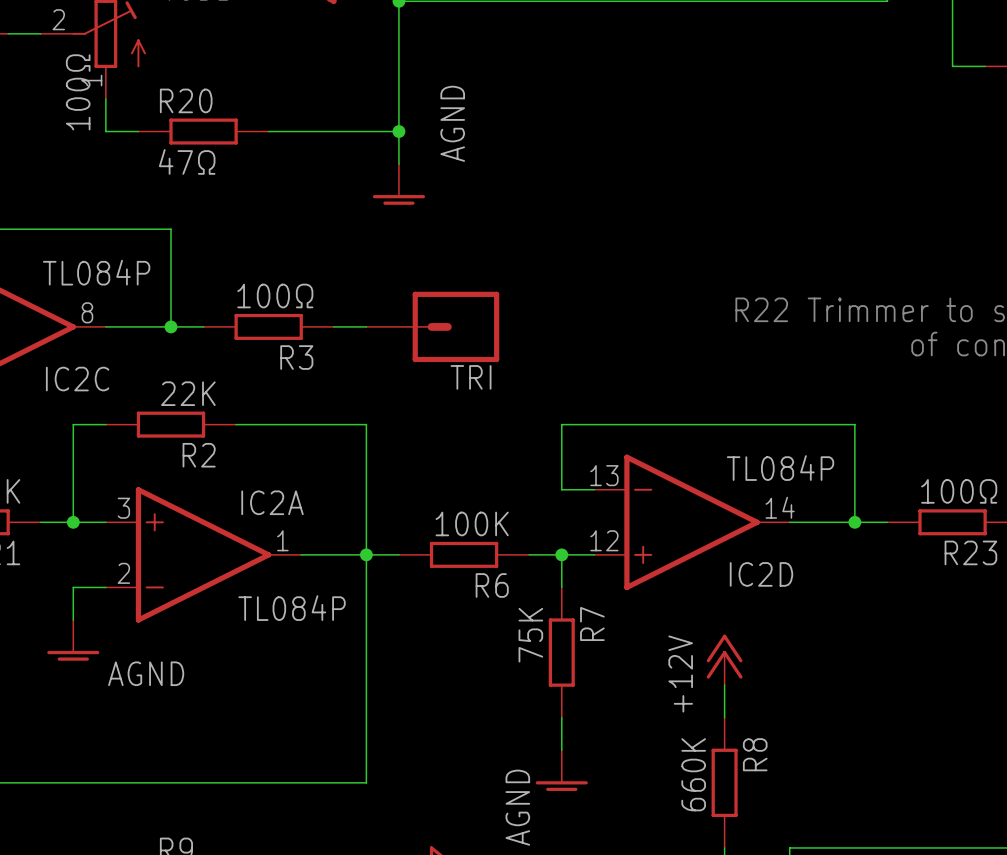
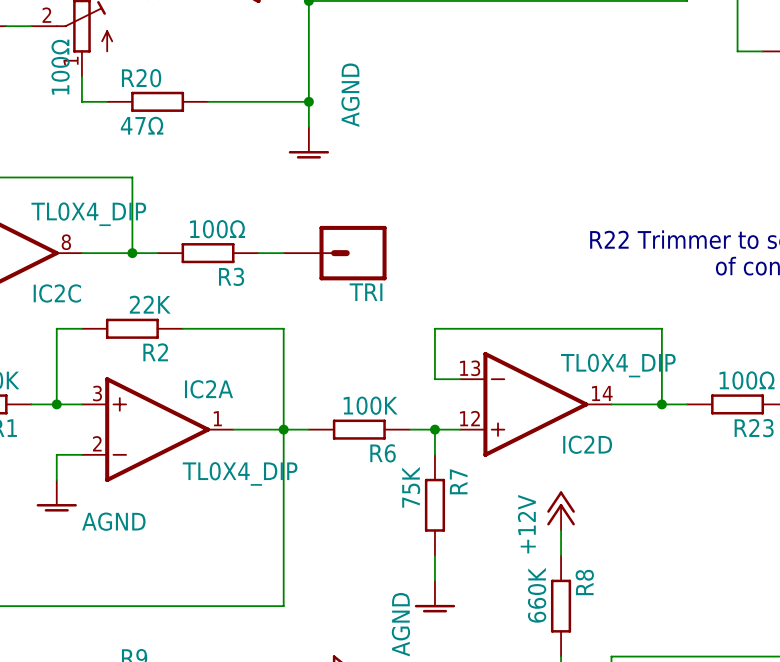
IC2C value: TL084P (96, 272) -> TL0X4_DIP (88, 214)
IC2D value: TL084P (780, 468) -> TL0X4_DIP (618, 365)
IC2A value: TL084P (292, 608) -> TL0X4_DIP (240, 473)

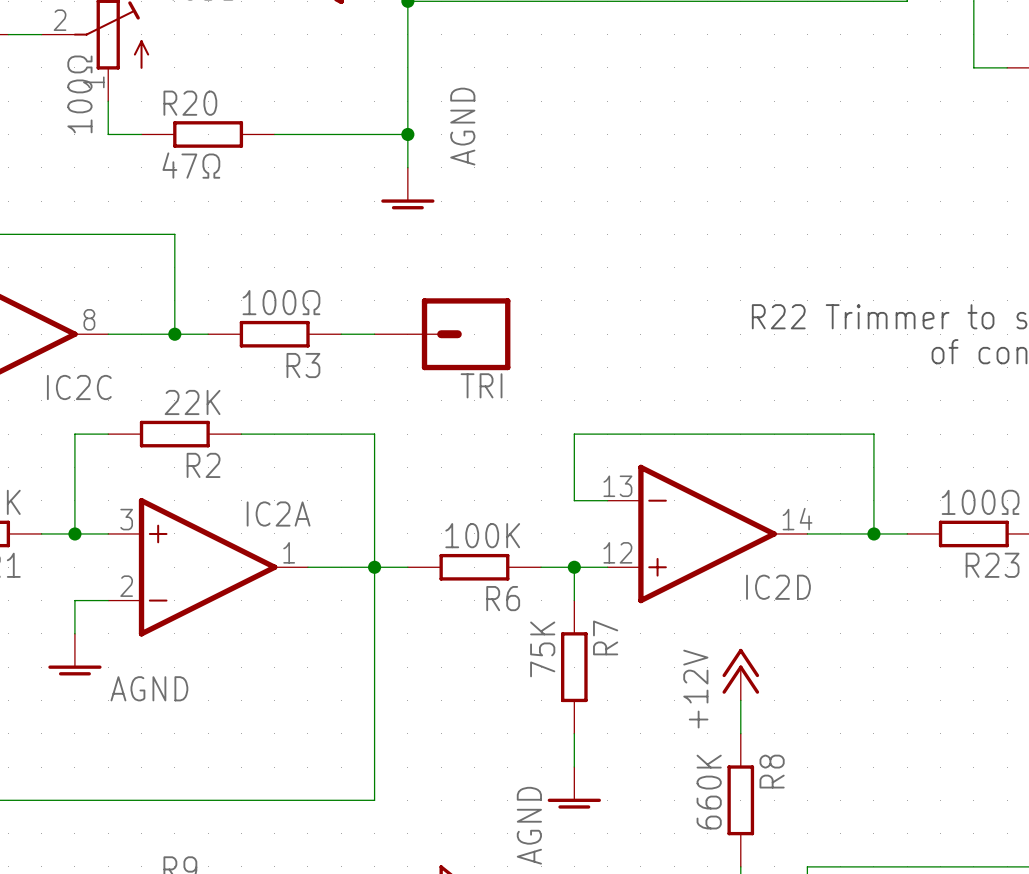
IC2C value: TL0X4_DIP (88, 214) -> none
IC2D value: TL0X4_DIP (618, 365) -> none
IC2A value: TL0X4_DIP (240, 473) -> none

